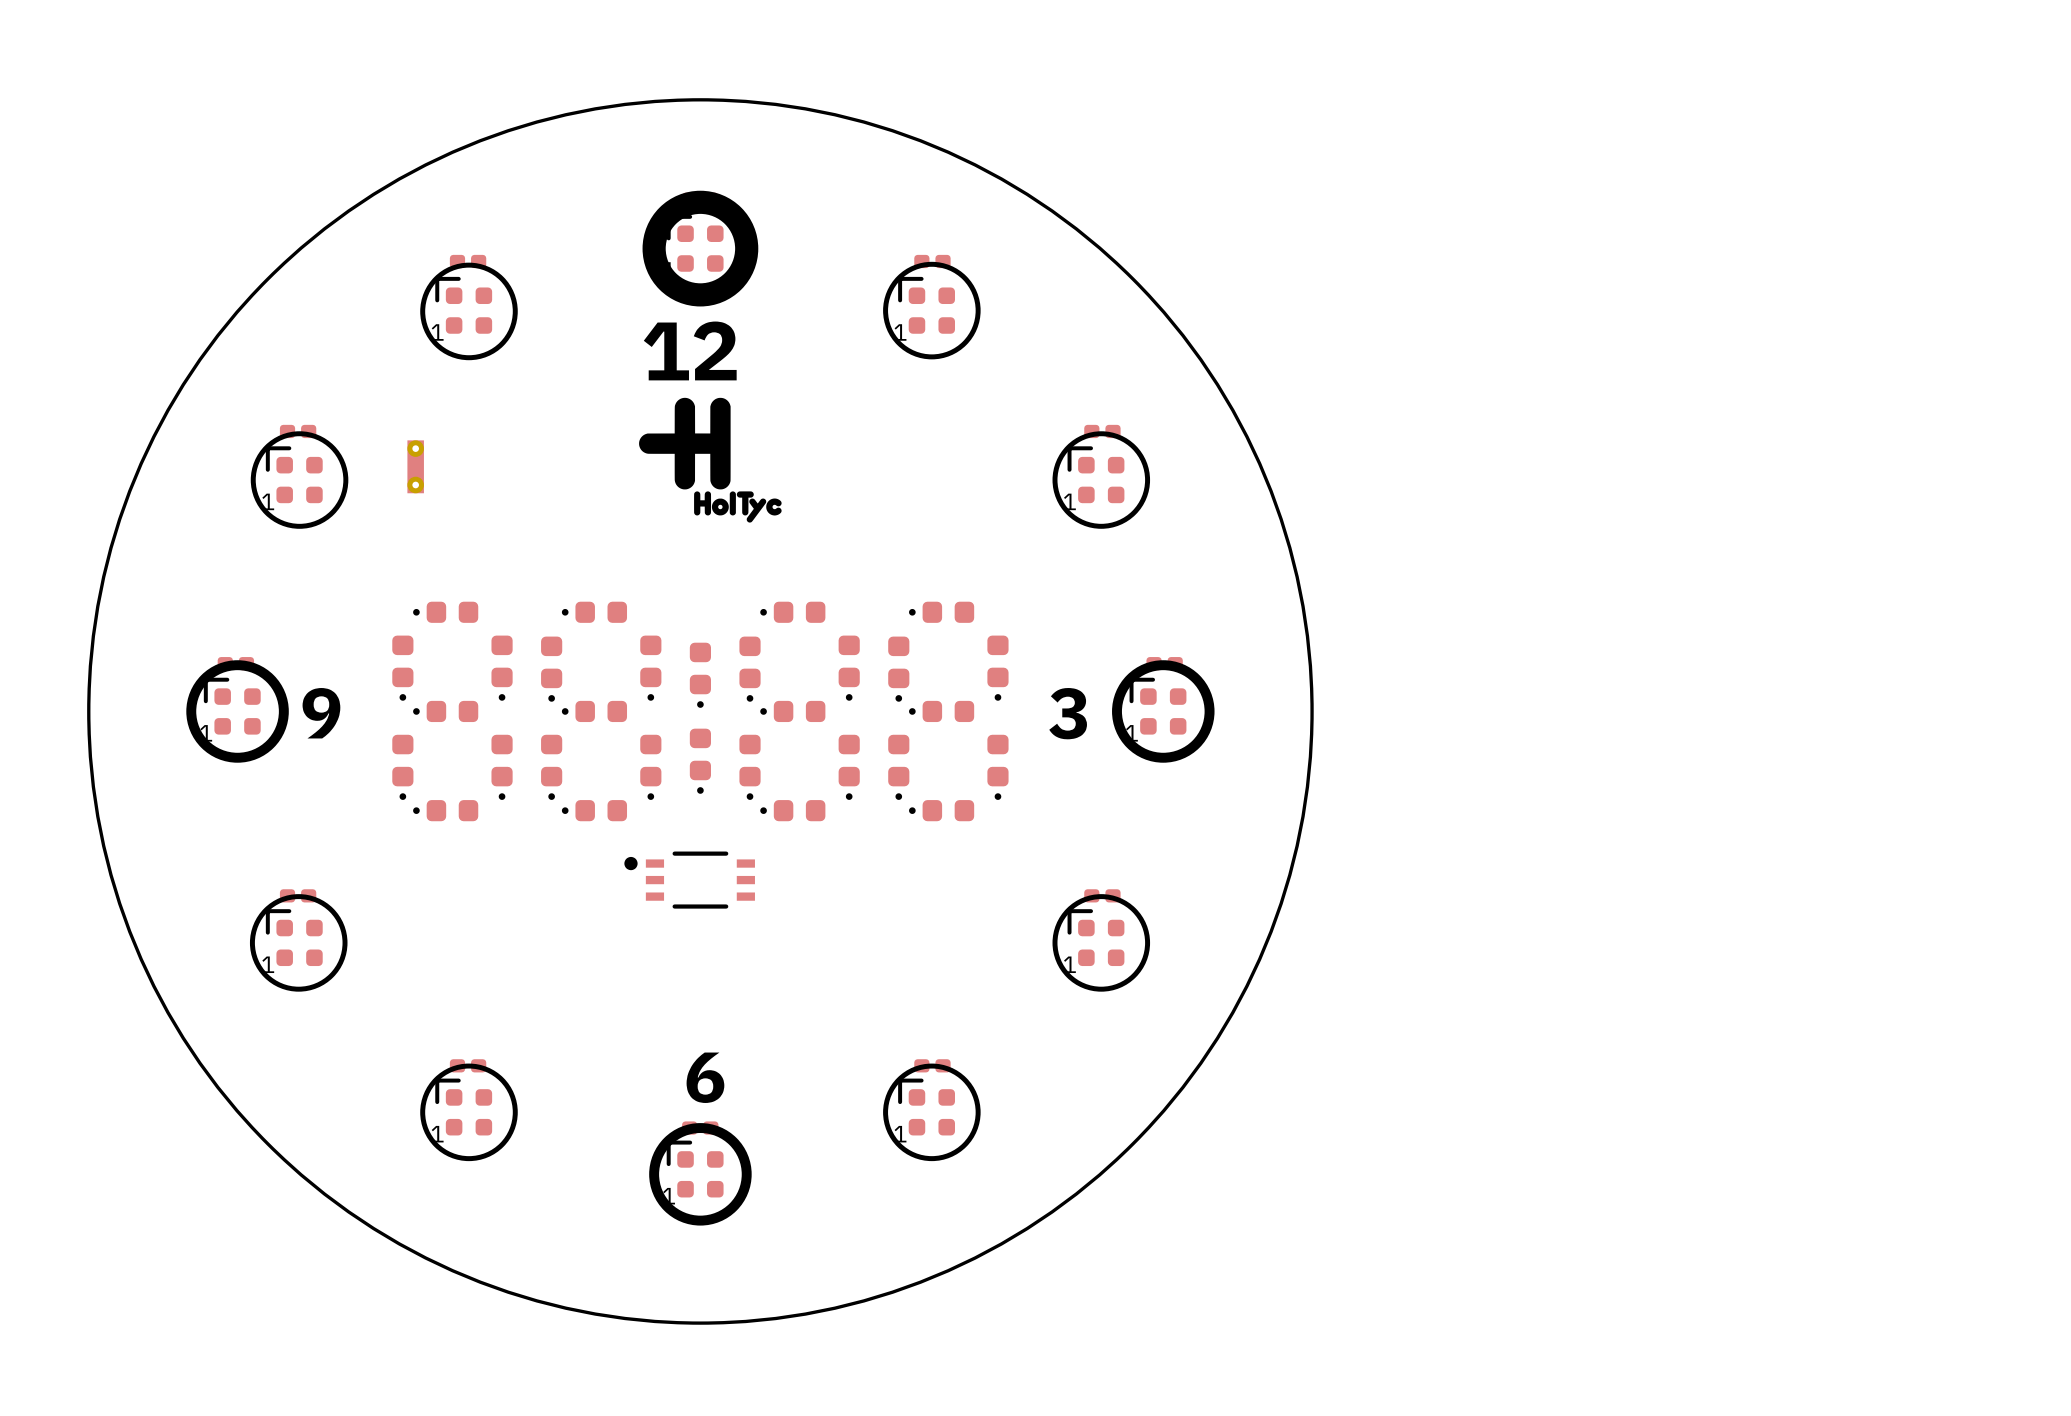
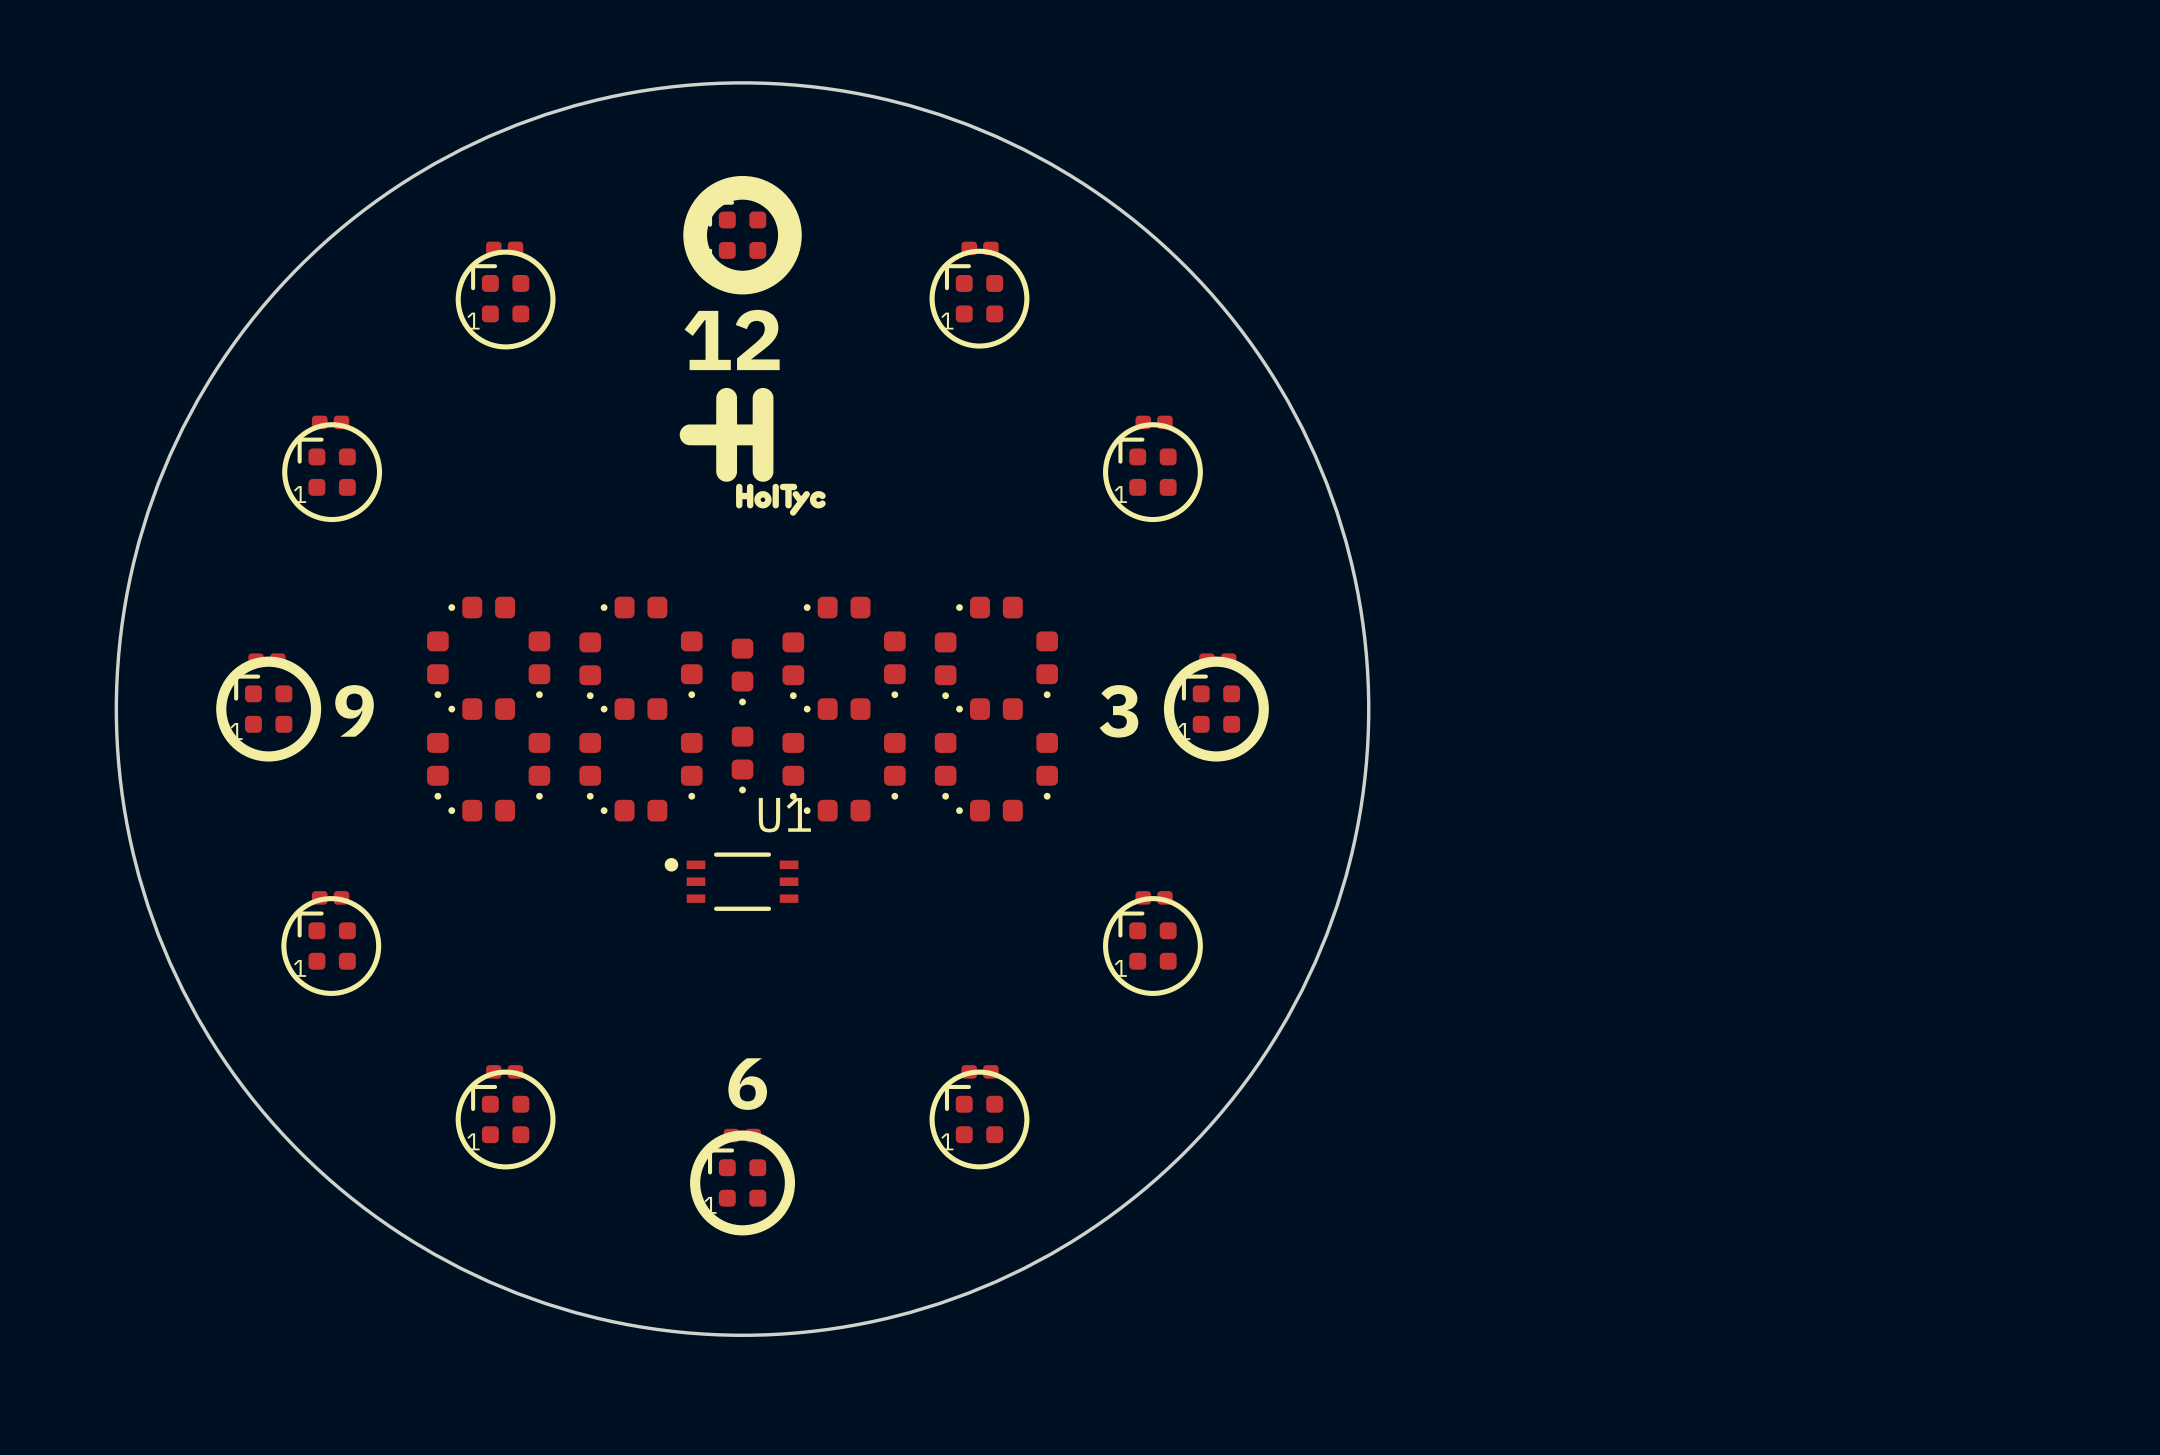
part: (415, 466) -> none
U1 name: none -> U1 (784, 815)

